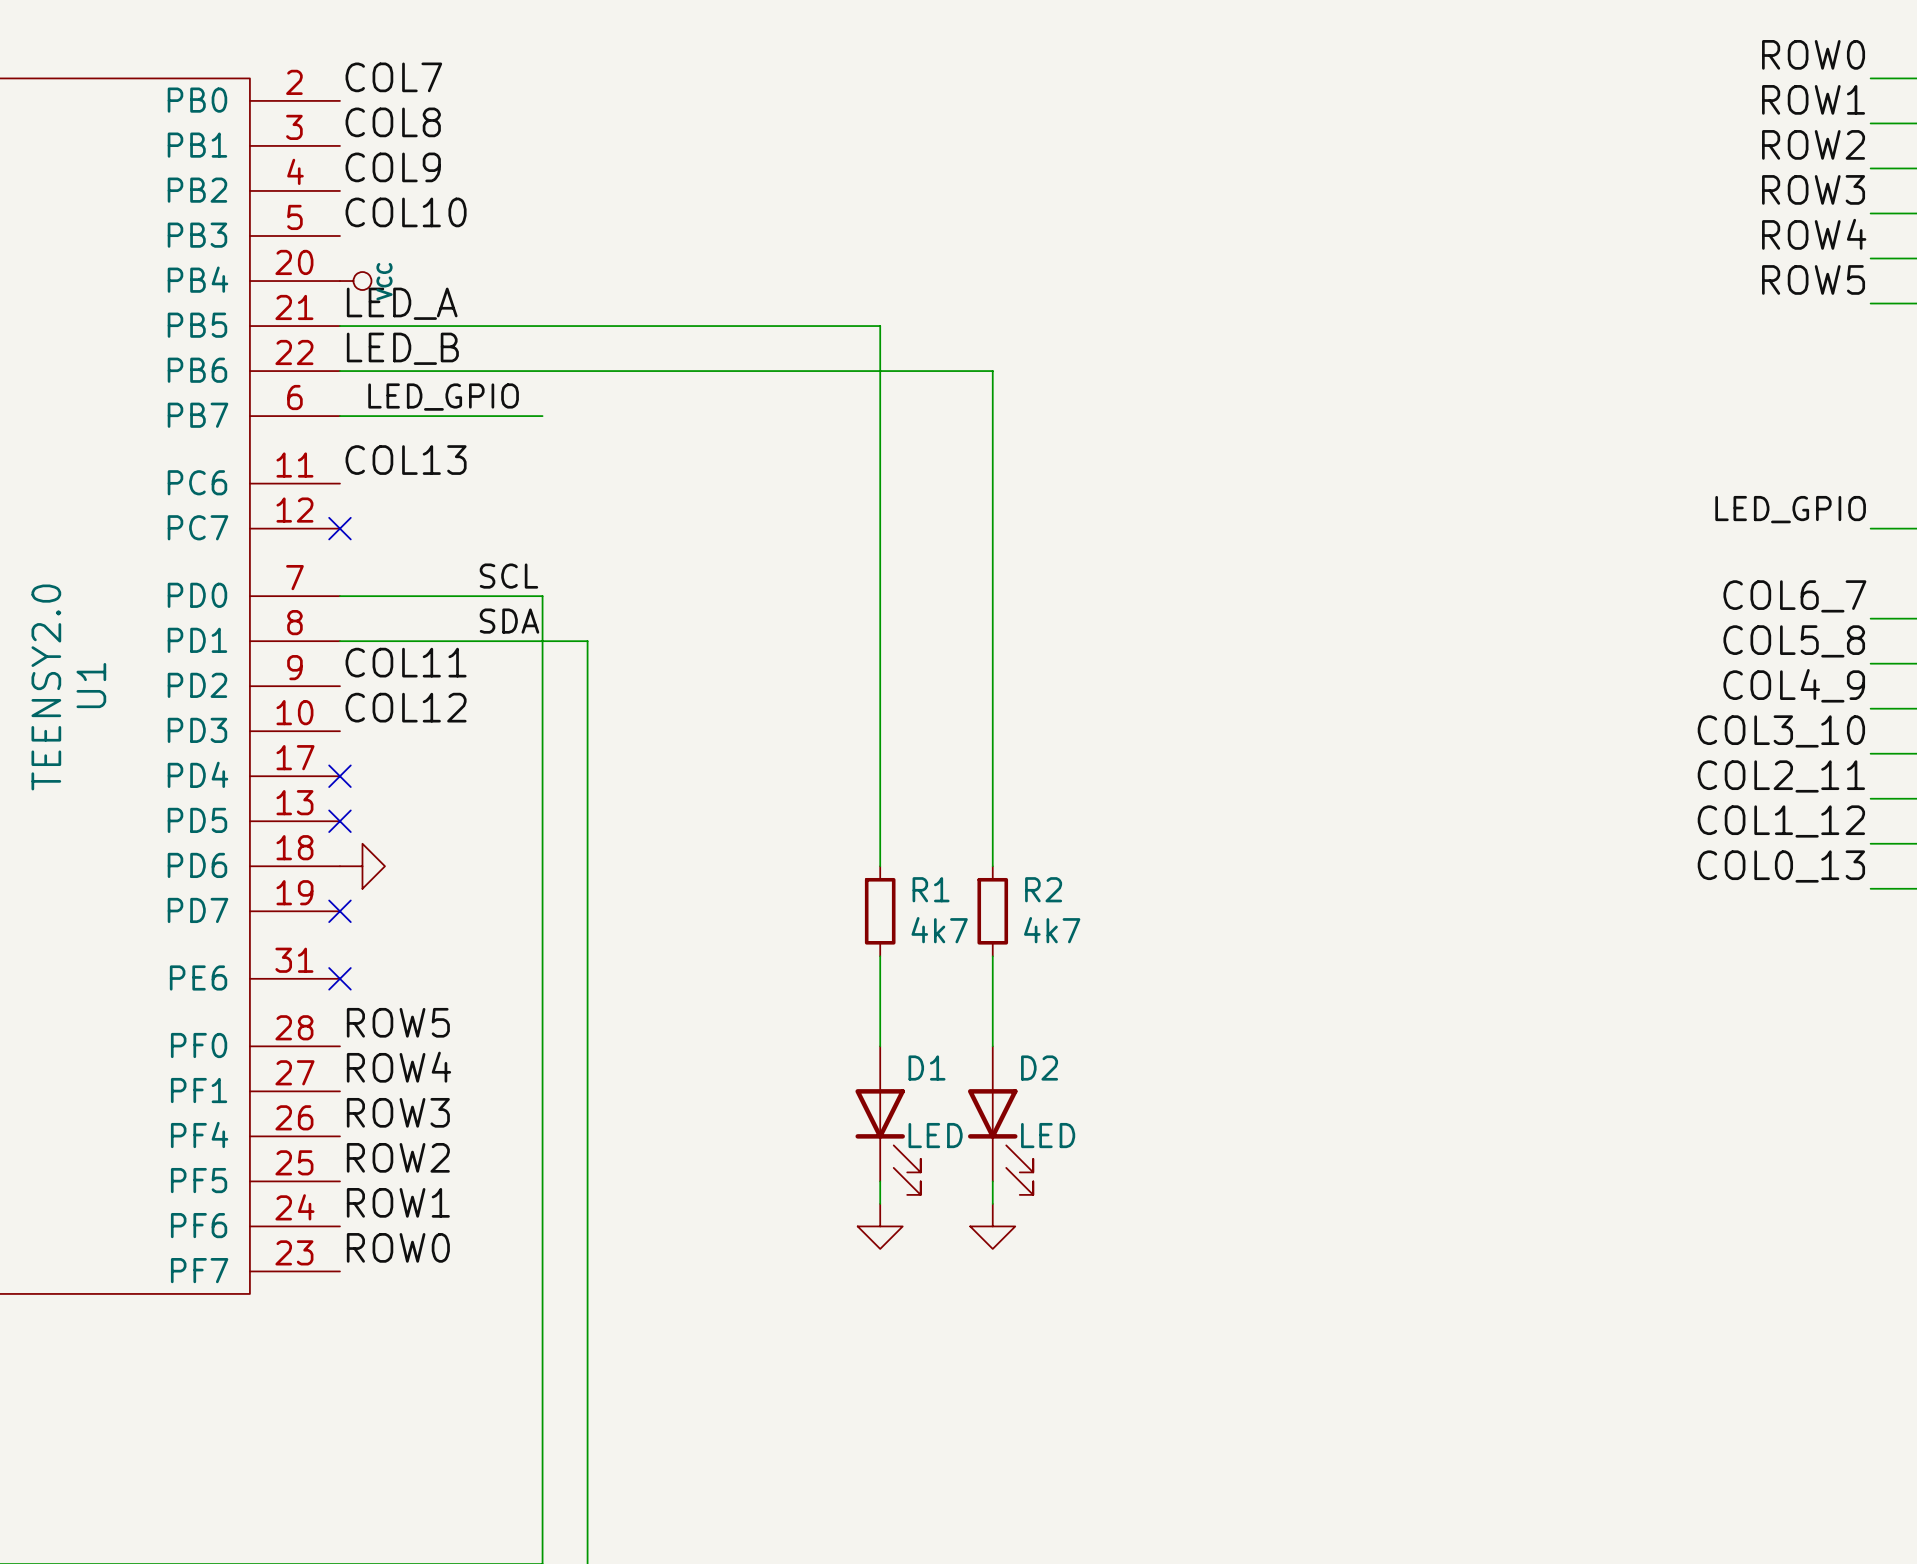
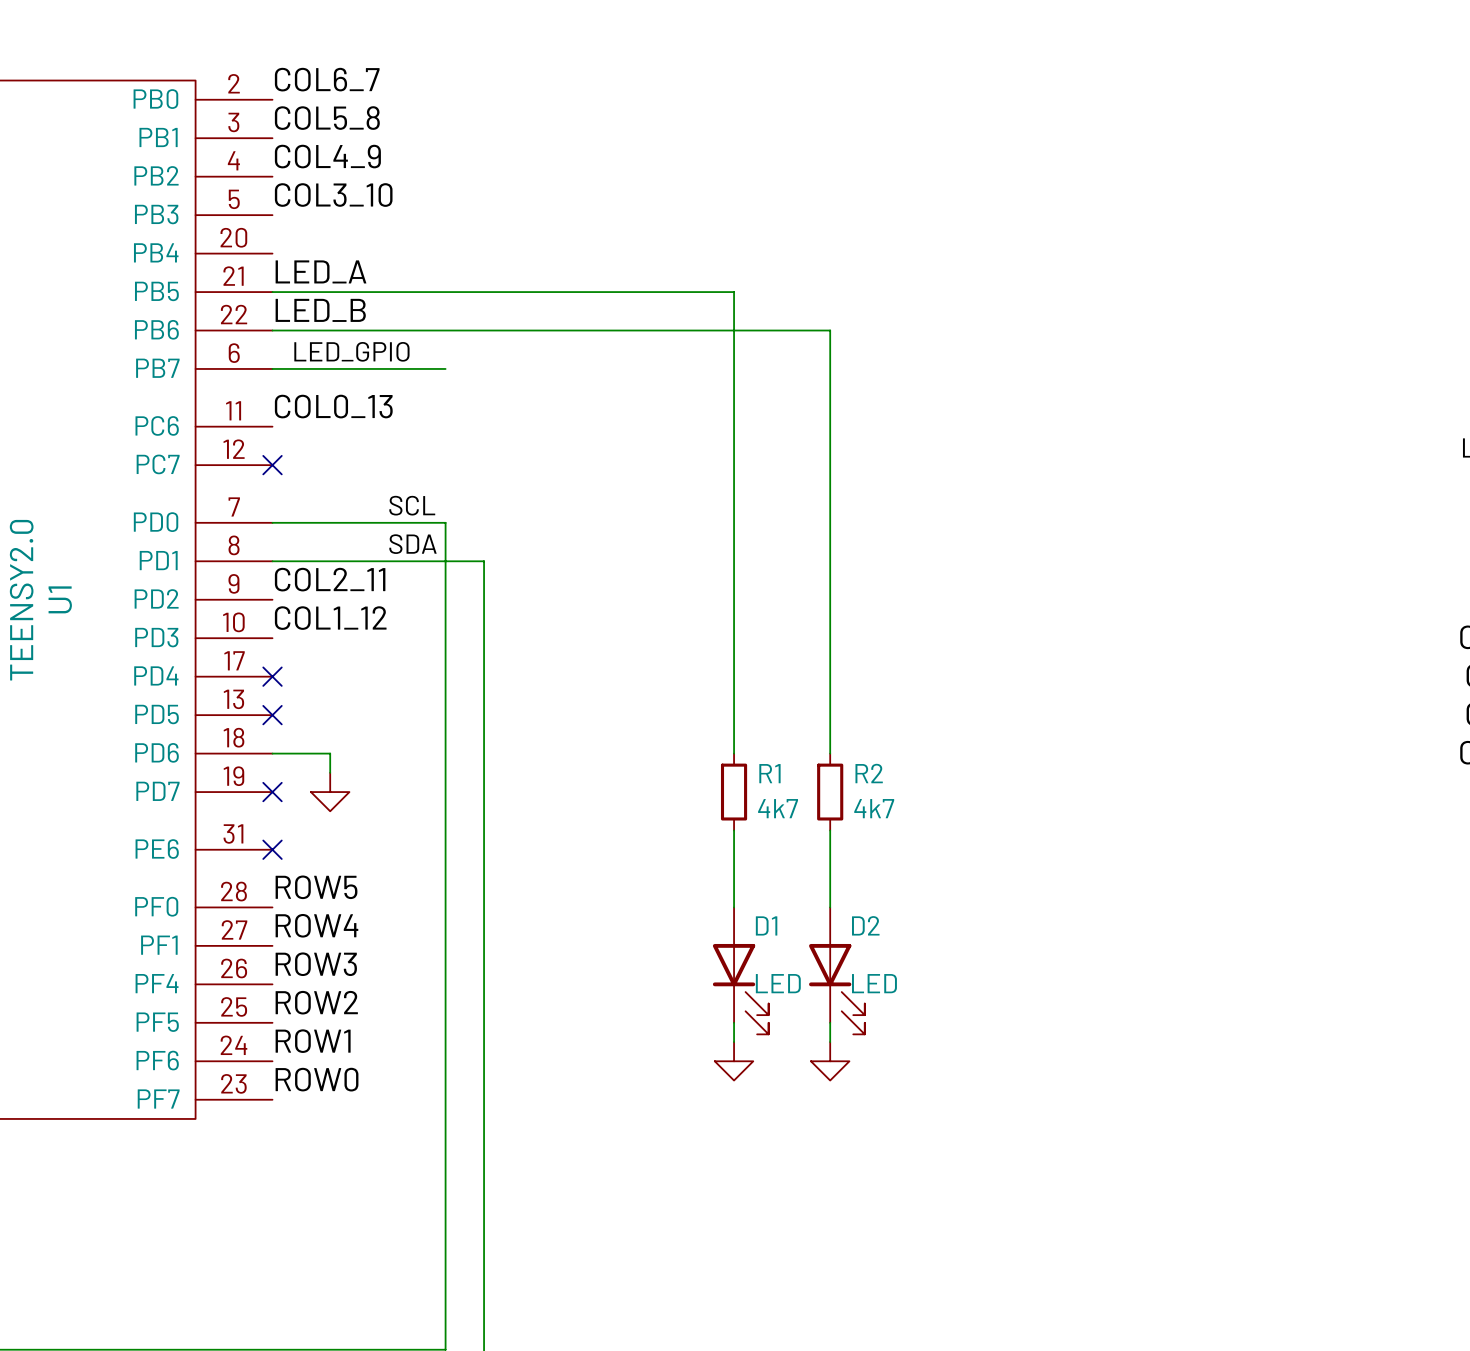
label: COL7 (393, 77) -> COL6_7 (327, 79)
label: COL8 (393, 122) -> COL5_8 (327, 118)
label: COL9 (393, 167) -> COL4_9 (327, 156)
label: COL10 (406, 212) -> COL3_10 (333, 195)
power symbol: VCC (355, 281) -> none
label: COL13 (406, 460) -> COL0_13 (333, 406)
label: COL11 (406, 662) -> COL2_11 (330, 579)
label: COL12 (406, 707) -> COL1_12 (330, 618)
wire: none -> (272, 753) (330, 753) (330, 772)
power symbol rotation: 0° (362, 866) -> 90° clockwise (330, 792)
power symbol position: (362, 866) -> (330, 792)

